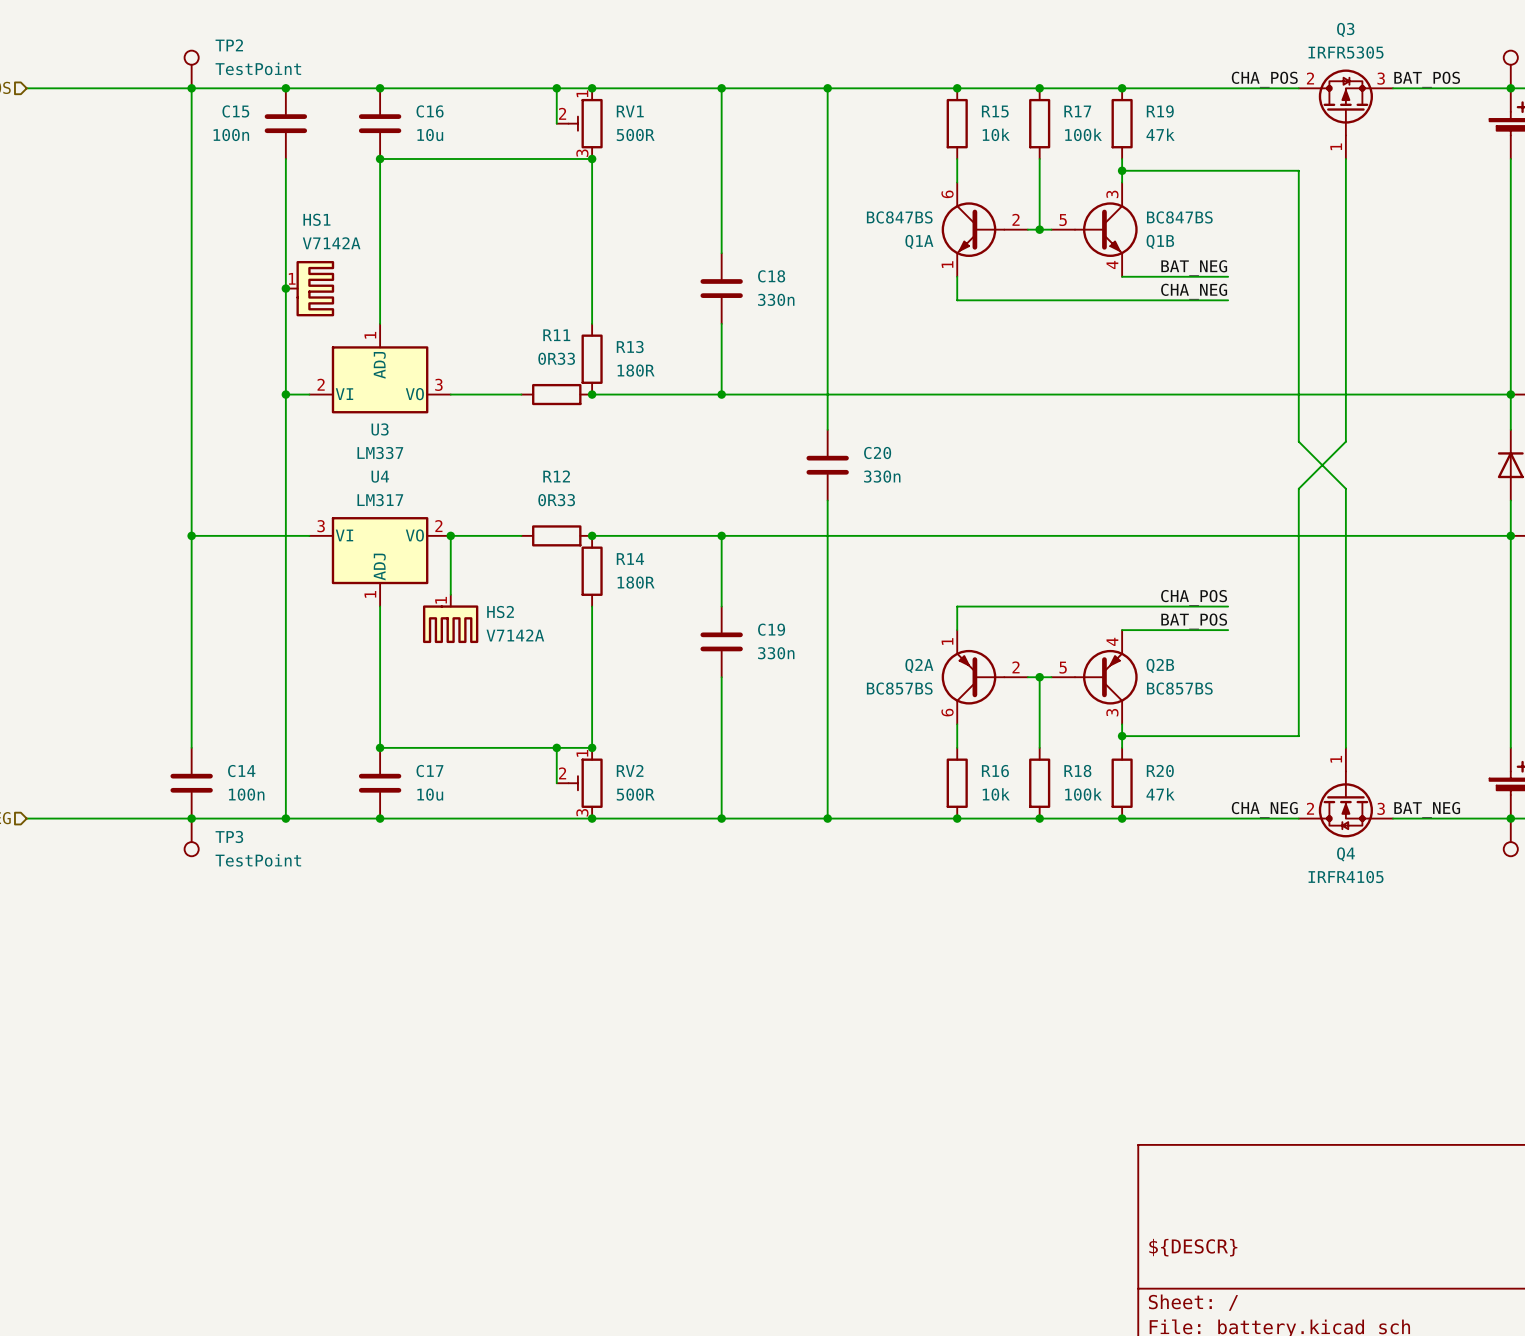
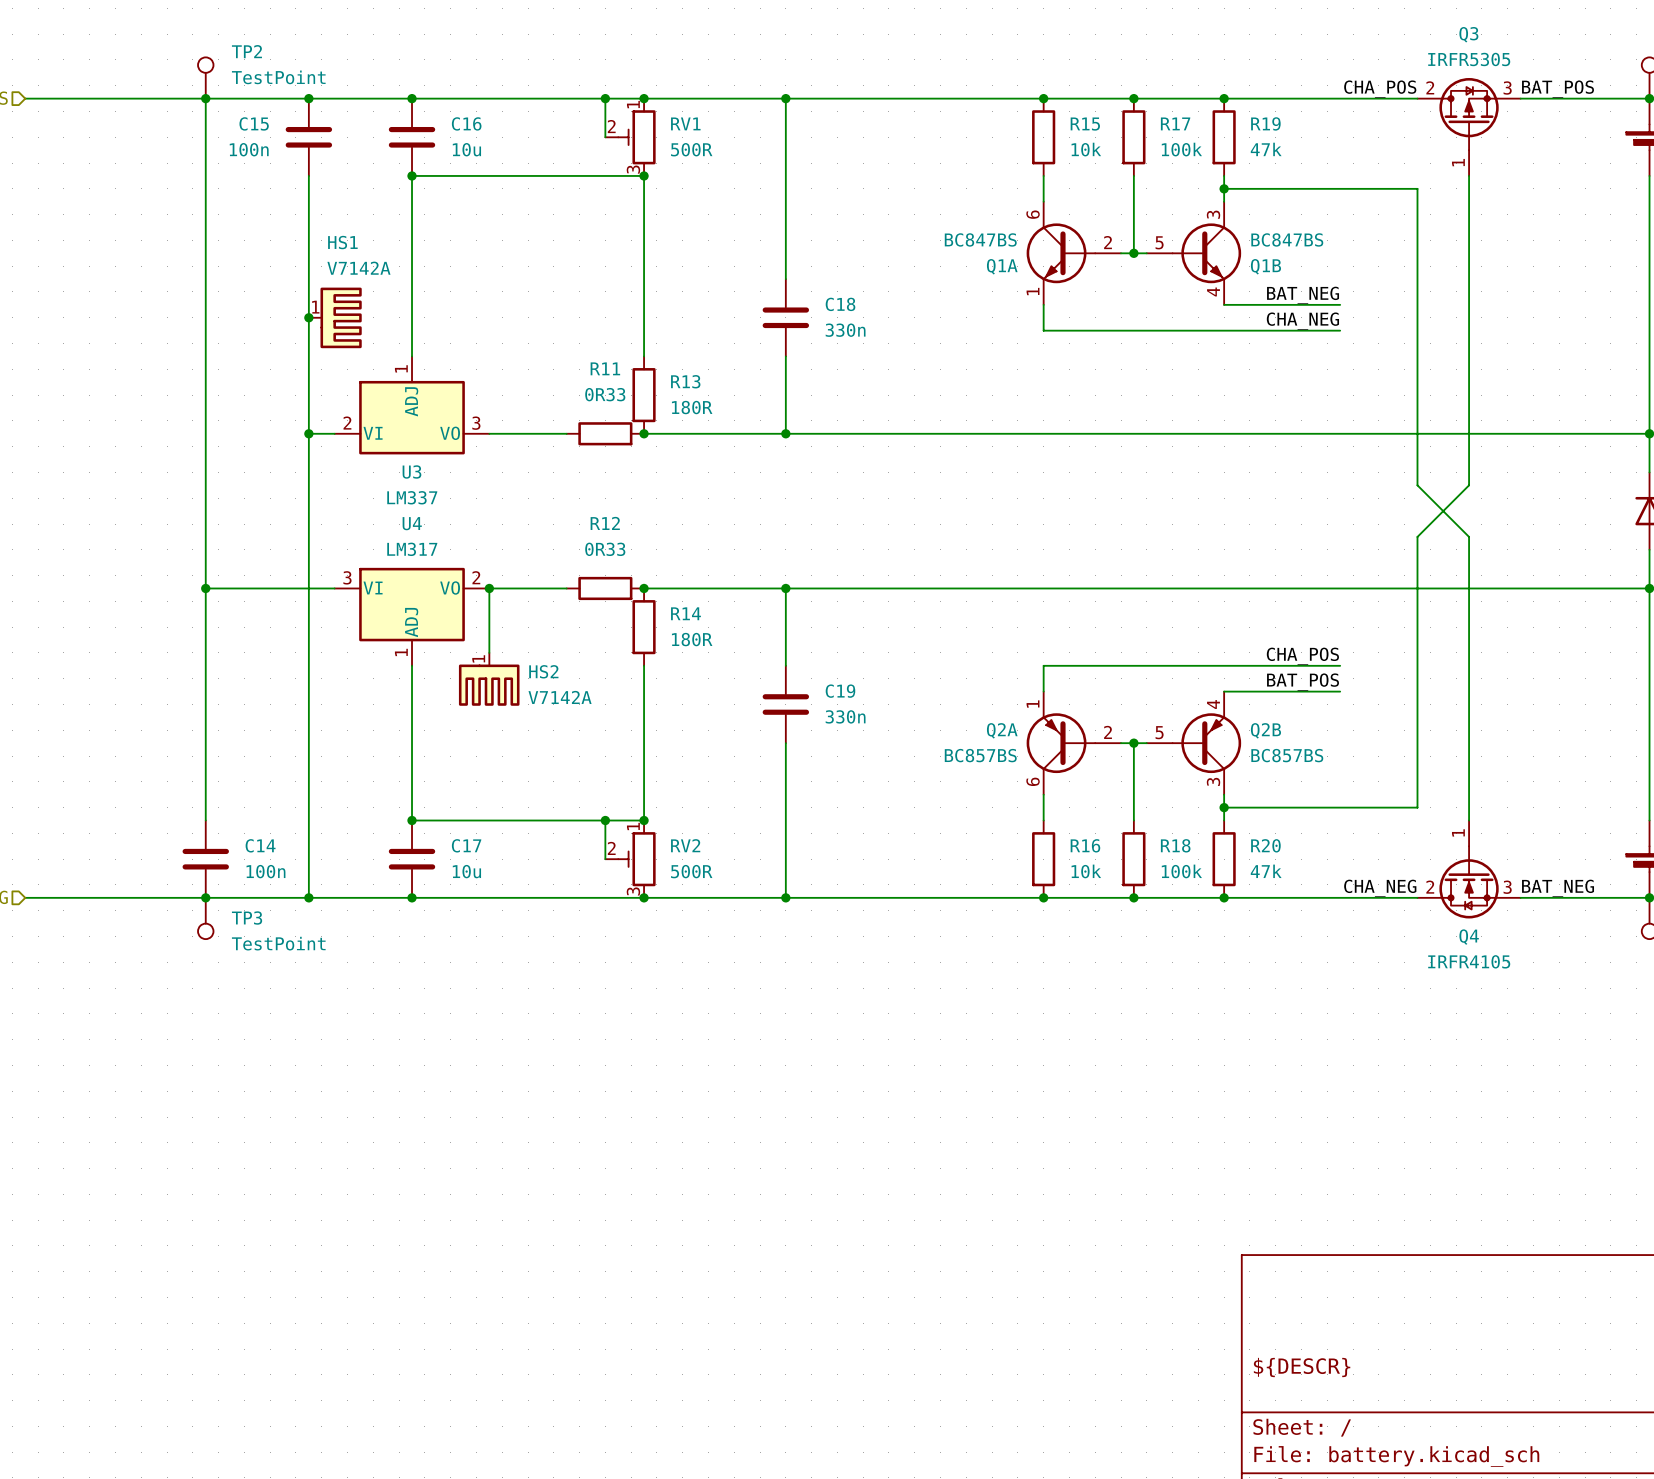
wire: (827, 88) (827, 429) -> none
junction: (827, 88) -> none
C20: 330n (827, 465) -> none
wire: (827, 500) (827, 818) -> none
junction: (827, 818) -> none

